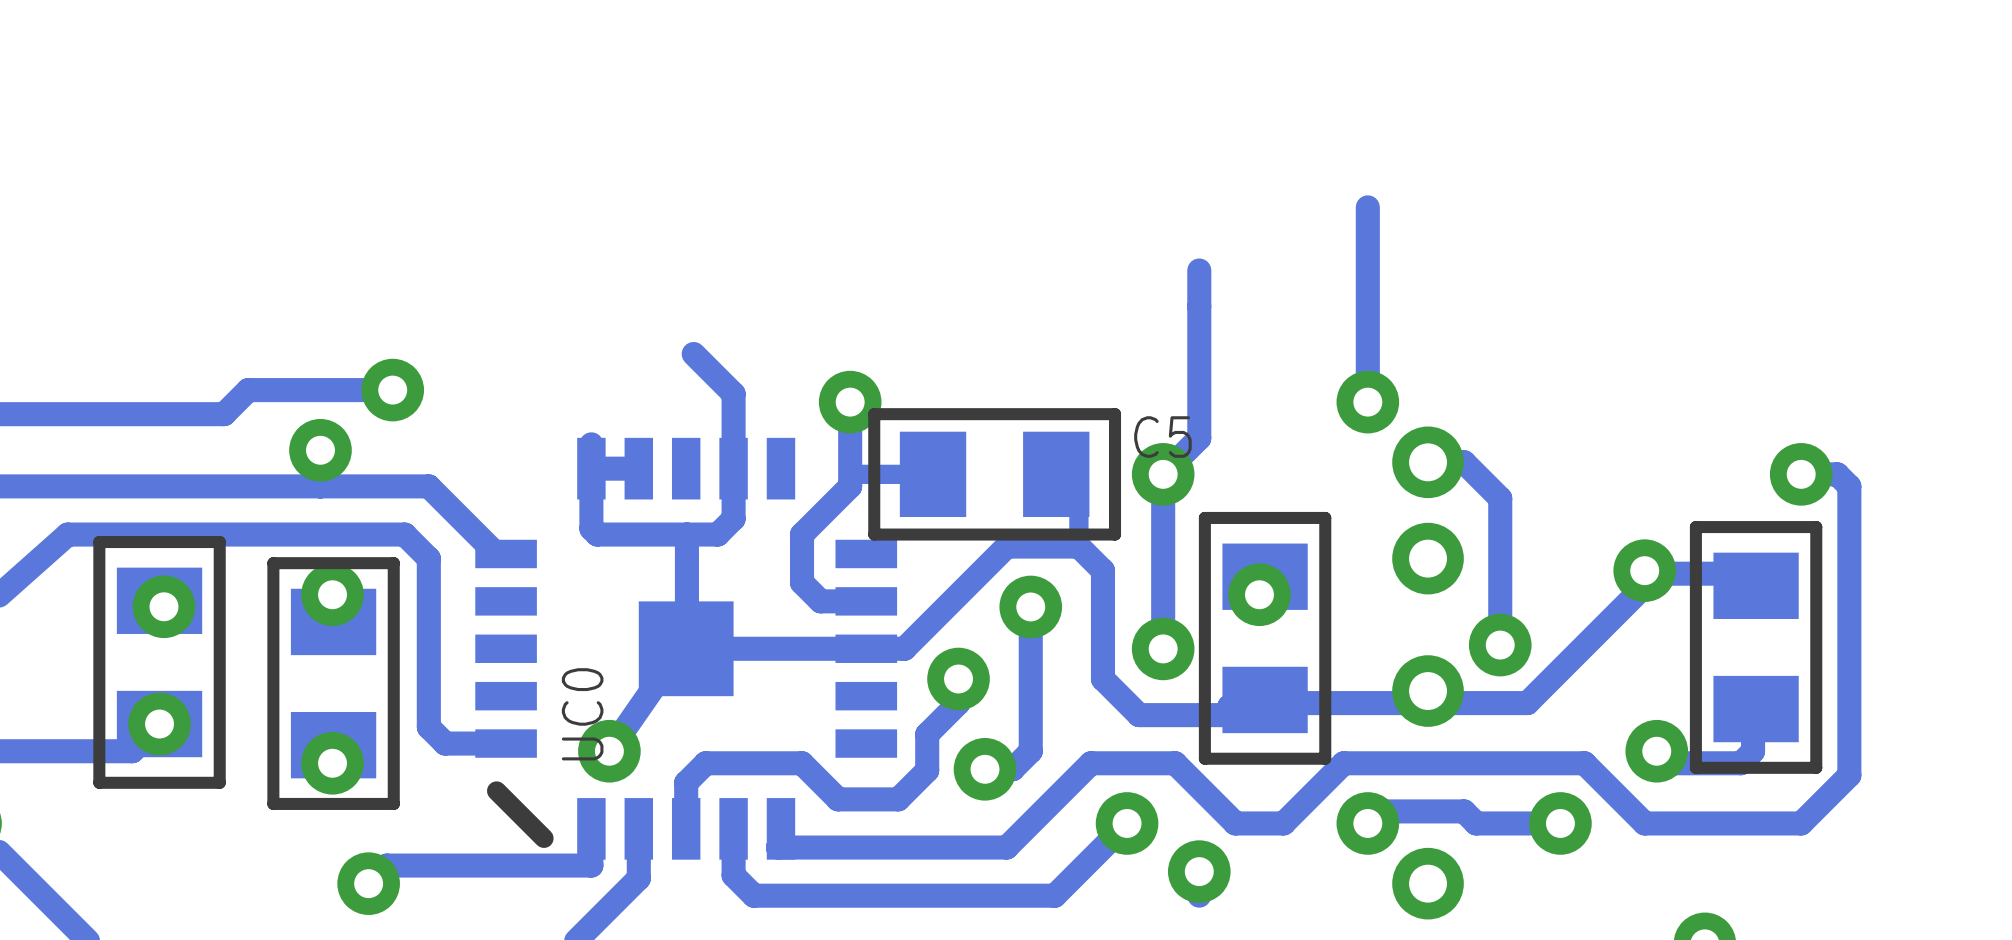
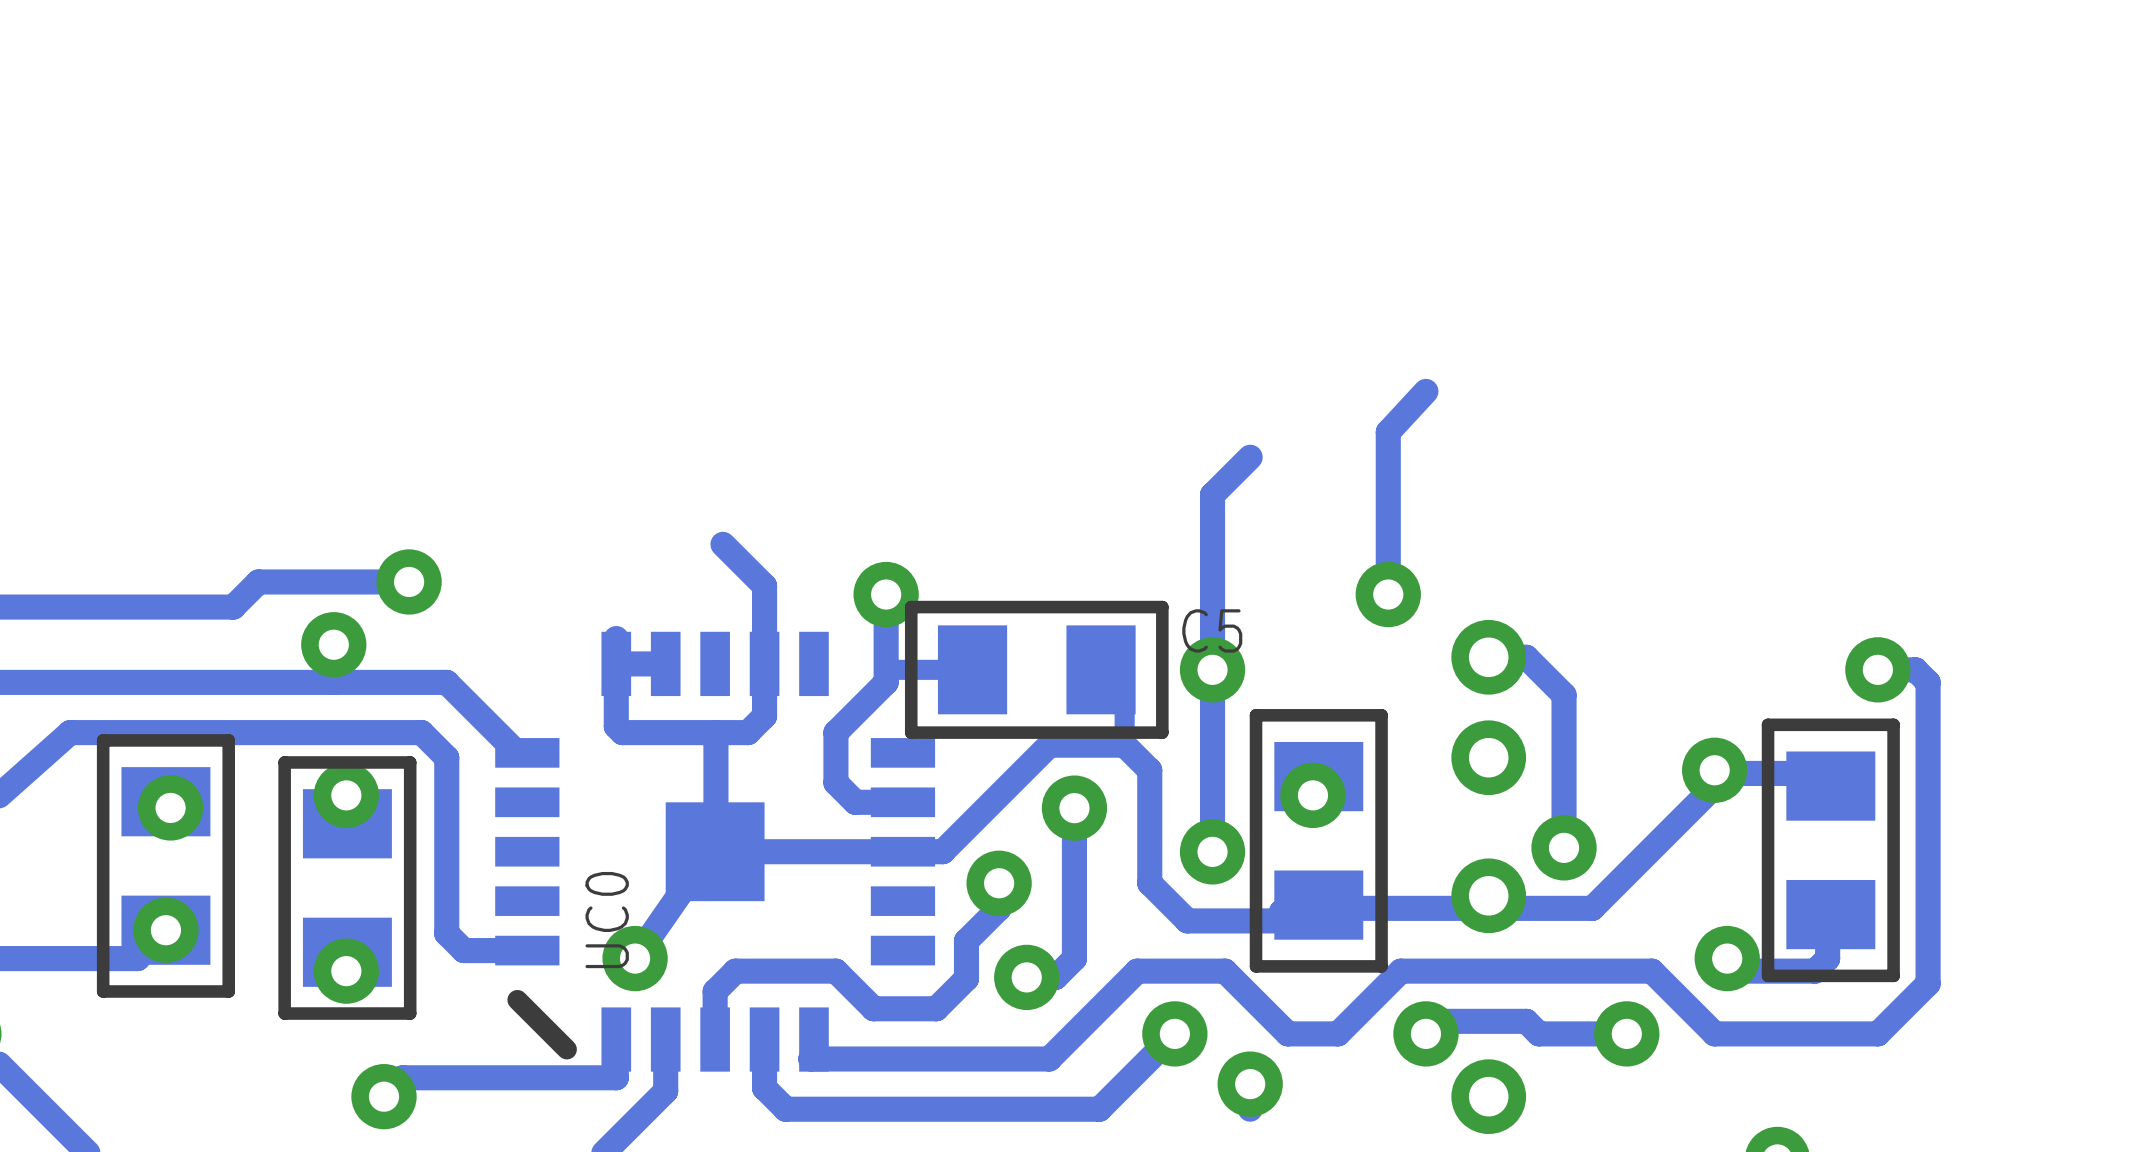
track: (1367, 207) (1367, 402) -> (1425, 391) (1388, 432) (1388, 594)
track: (1199, 270) (1199, 438) (1163, 474) -> (1250, 457) (1212, 494) (1212, 669)
via position: (1367, 402) -> (1388, 594)

